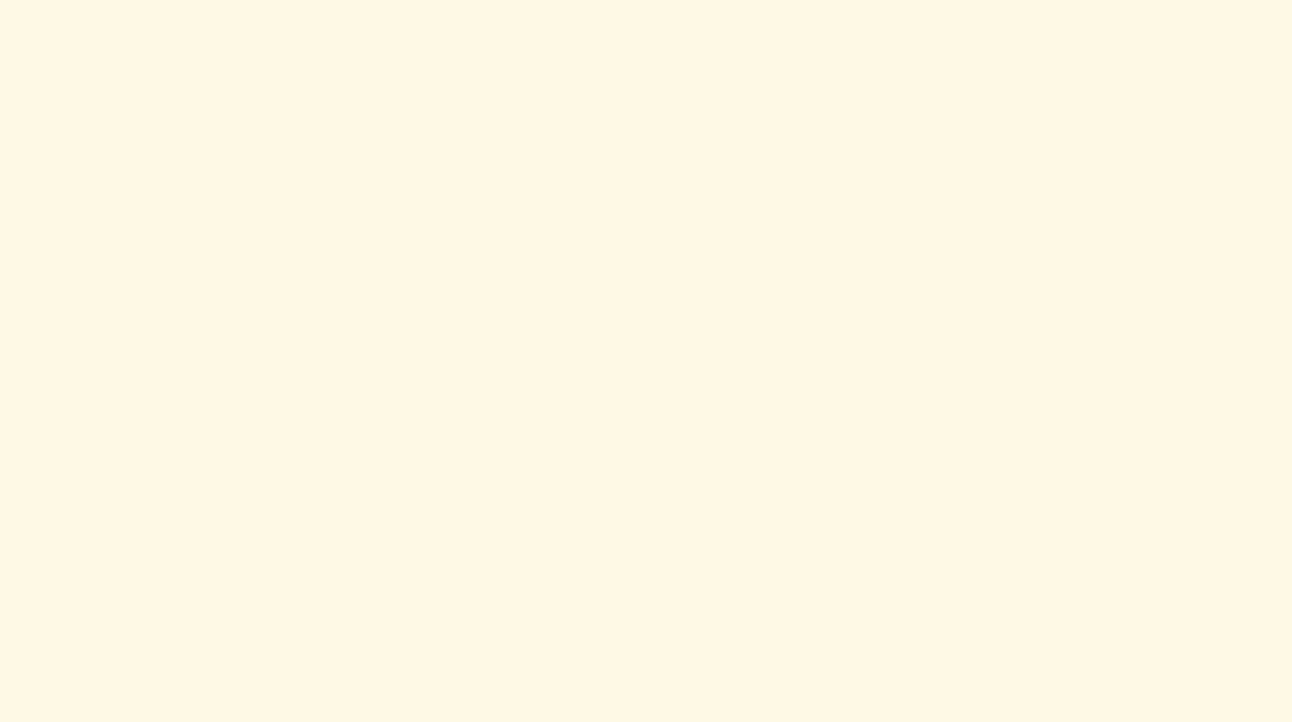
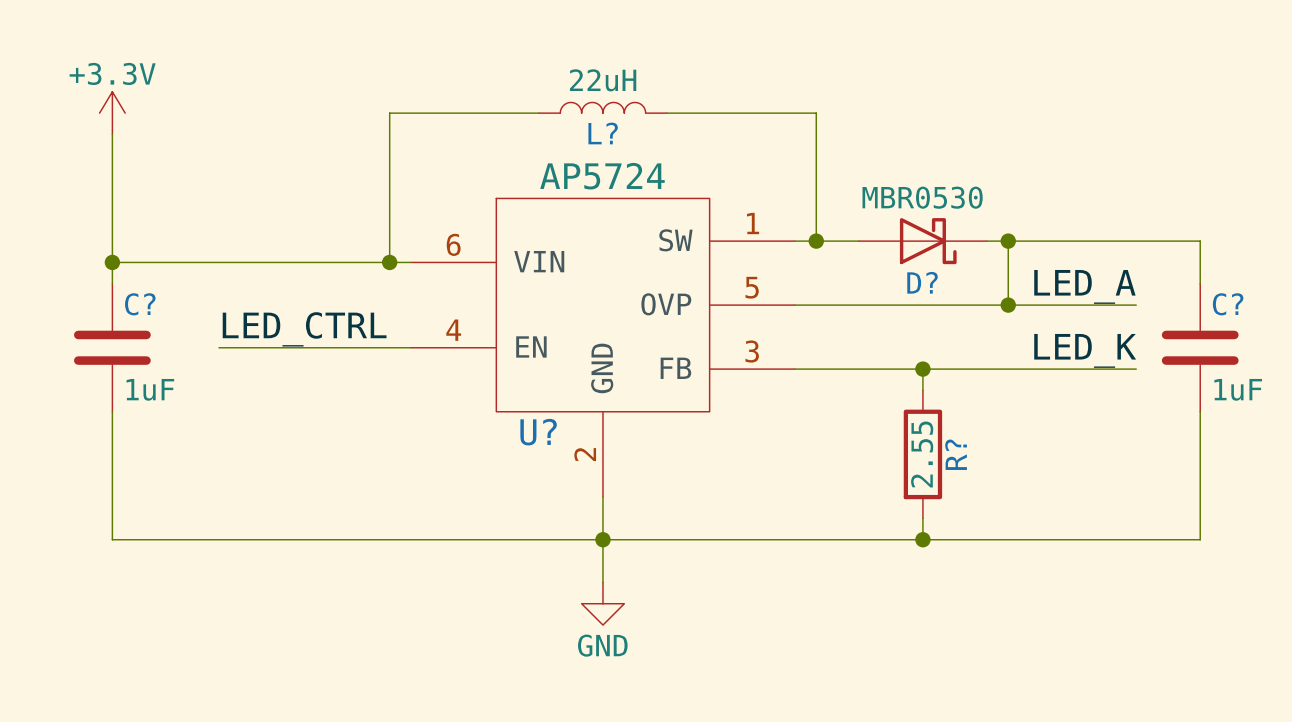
L?: none -> 22uH (602, 107)
power symbol: none -> +3.3V (112, 113)
wire: none -> (538, 113) (389, 113) (389, 262)
wire: none -> (666, 113) (816, 113) (816, 241)
wire: none -> (112, 134) (112, 283)
wire: none -> (794, 241) (858, 241)
junction: none -> (816, 241)
D?: none -> MBR0530 (922, 241)
wire: none -> (986, 241) (1200, 241) (1200, 283)
wire: none -> (1008, 241) (1008, 305)
junction: none -> (1008, 241)
wire: none -> (112, 262) (411, 262)
junction: none -> (112, 262)
junction: none -> (389, 262)
label: none -> LED_A (1084, 286)
wire: none -> (794, 305) (1136, 305)
junction: none -> (1008, 305)
label: none -> LED_CTRL (304, 329)
C?: none -> 1uF (112, 347)
wire: none -> (219, 347) (411, 347)
U?: none -> AP5724 (602, 347)
C?: none -> 1uF (1200, 347)
label: none -> LED_K (1085, 350)
wire: none -> (794, 369) (1136, 369)
wire: none -> (922, 369) (922, 390)
junction: none -> (922, 369)
wire: none -> (112, 411) (112, 539) (1200, 539) (1200, 411)
R?: none -> 2.55 (922, 454)
wire: none -> (602, 497) (602, 582)
wire: none -> (922, 518) (922, 539)
junction: none -> (602, 539)
junction: none -> (922, 539)
power symbol: none -> GND (602, 603)

